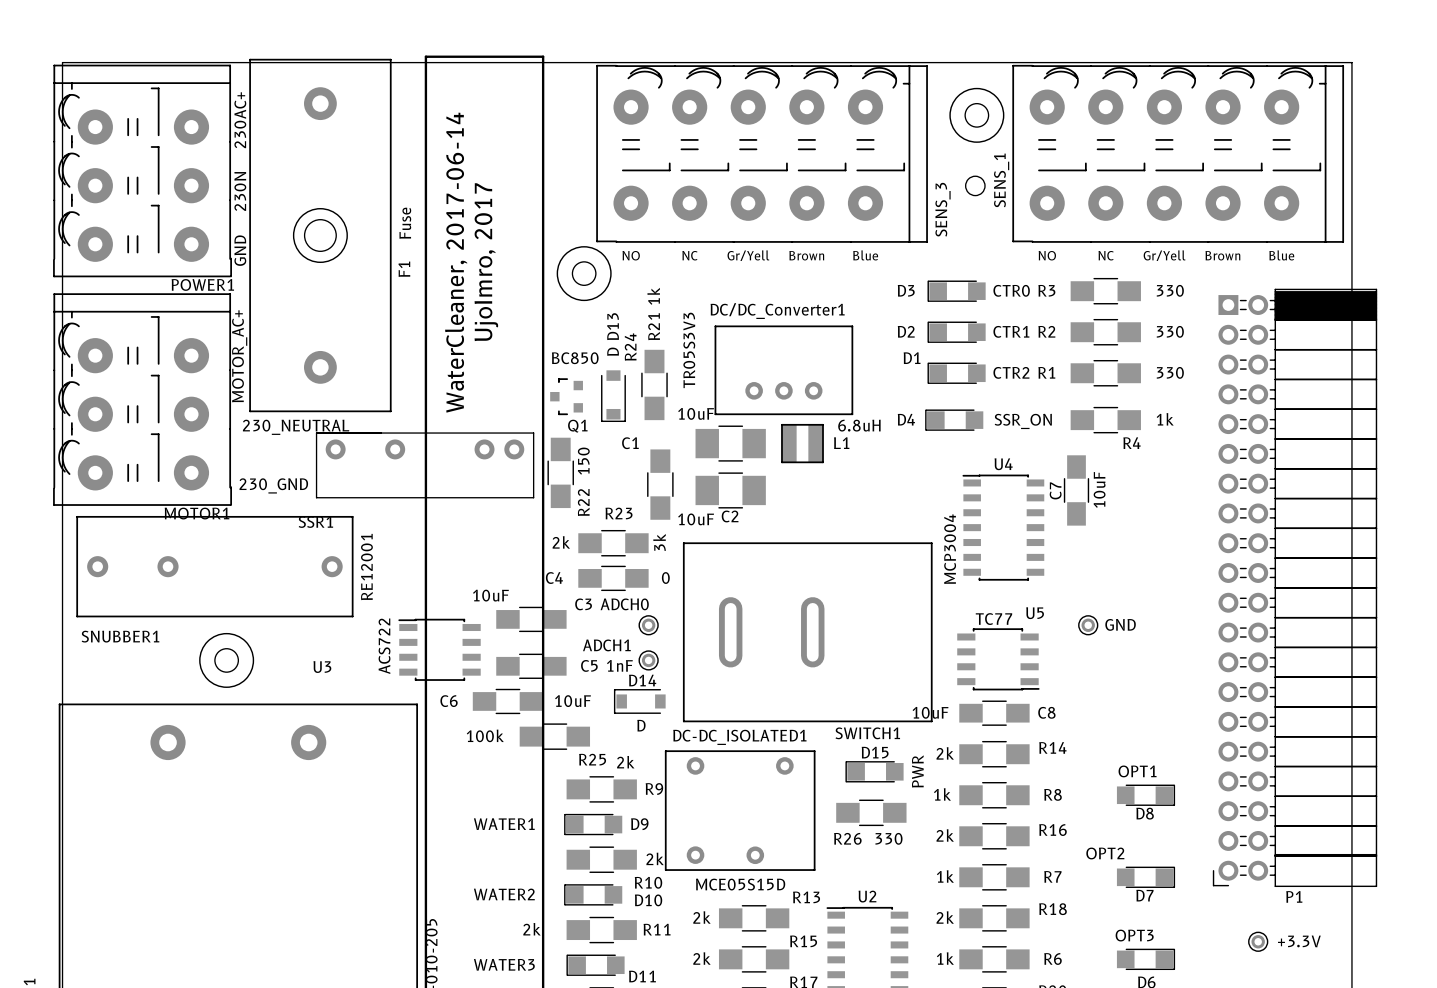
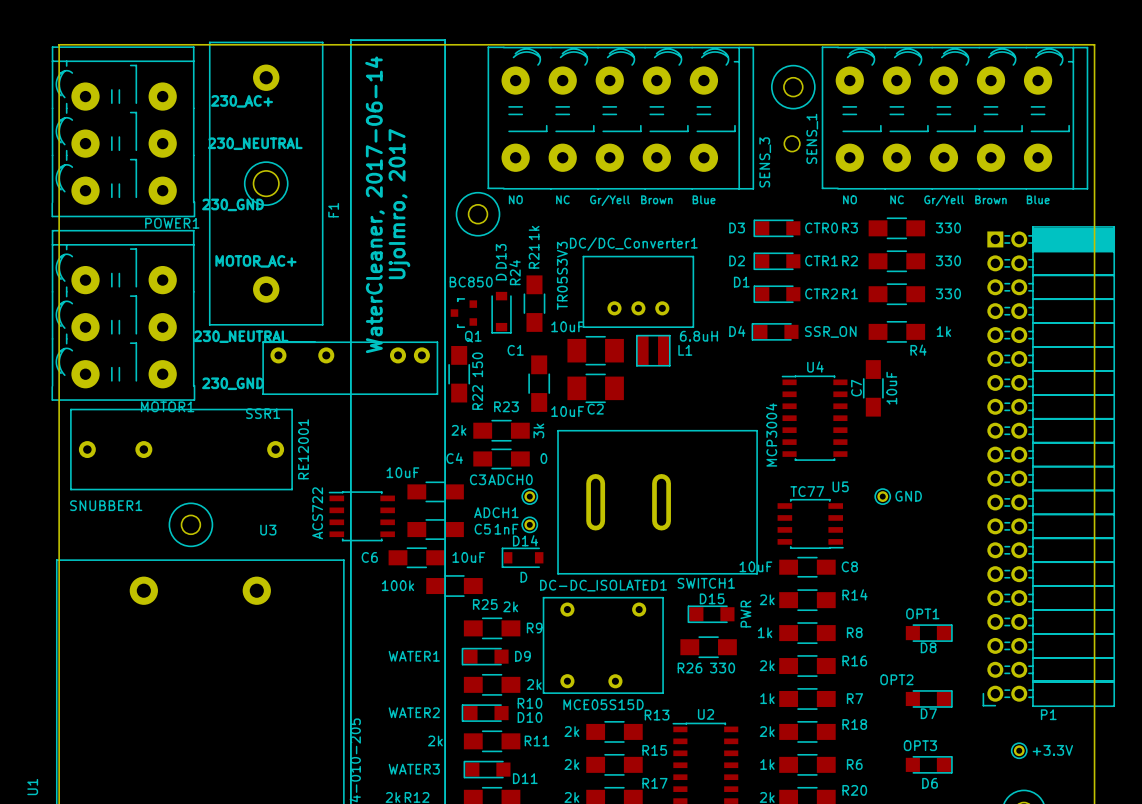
text: 230AC+ (240, 120) -> 230_AC+ (242, 101)
text: none -> 230_NEUTRAL (255, 143)
text: 230N (240, 191) -> none
F1 value: Fuse (405, 223) -> none
text: GND (240, 250) -> 230_GND (233, 204)
text rotation: 0° (239, 356) -> 90° clockwise (255, 261)

